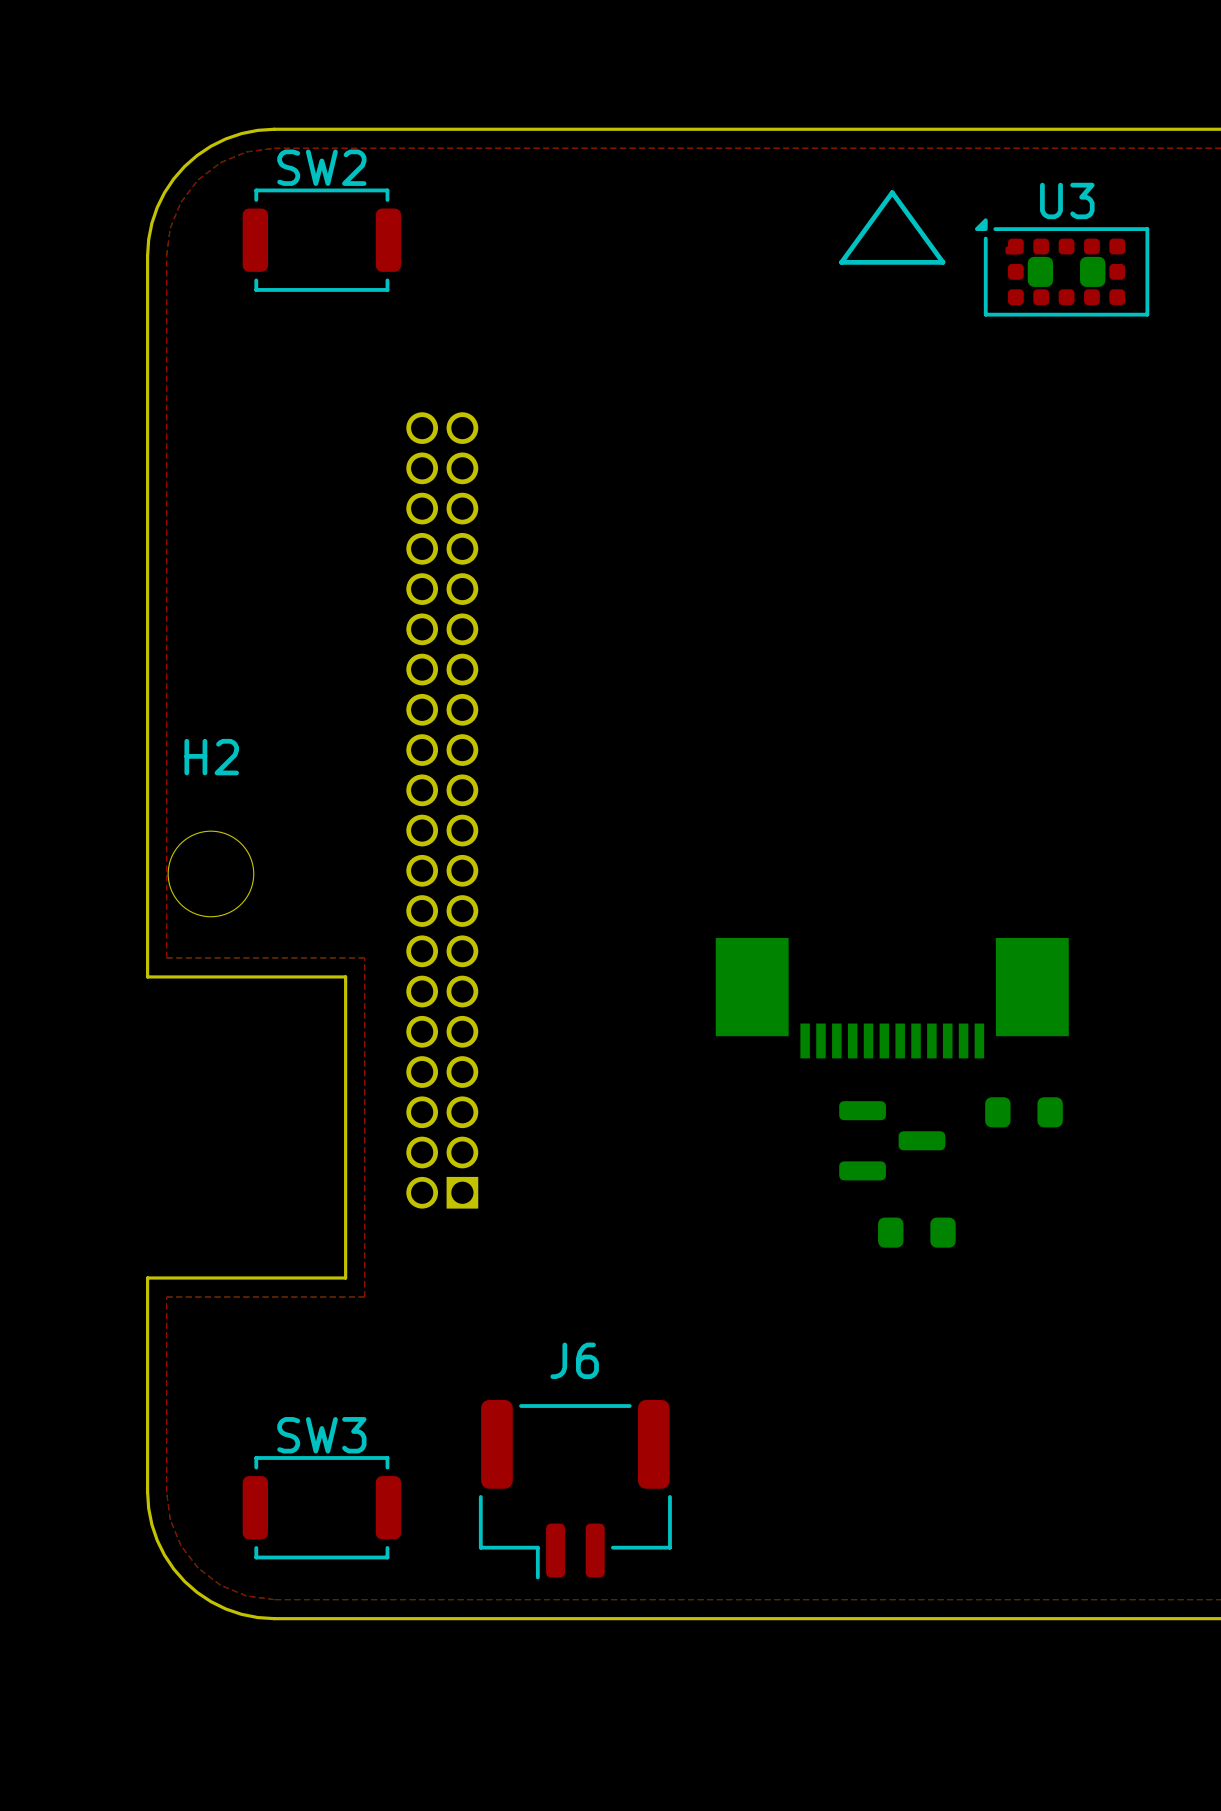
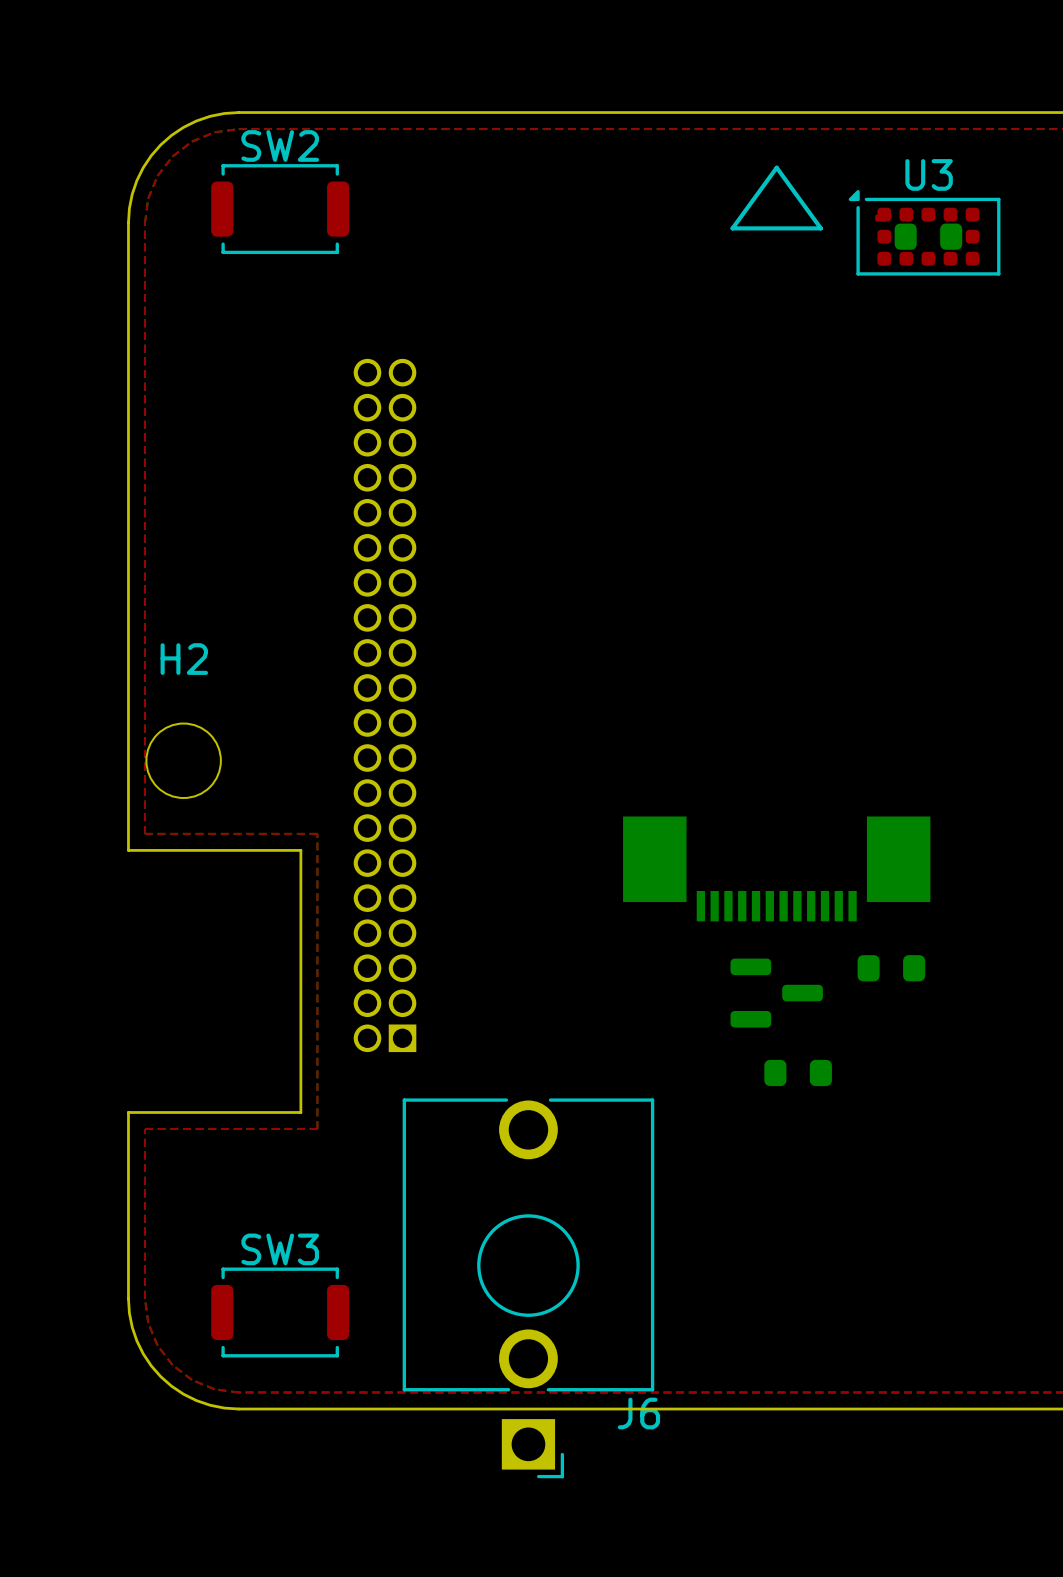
J6 name position: J6 (574, 1360) -> J6 (638, 1413)
J6 footprint: [478, 1399, 672, 1580] -> [402, 1098, 655, 1479]

